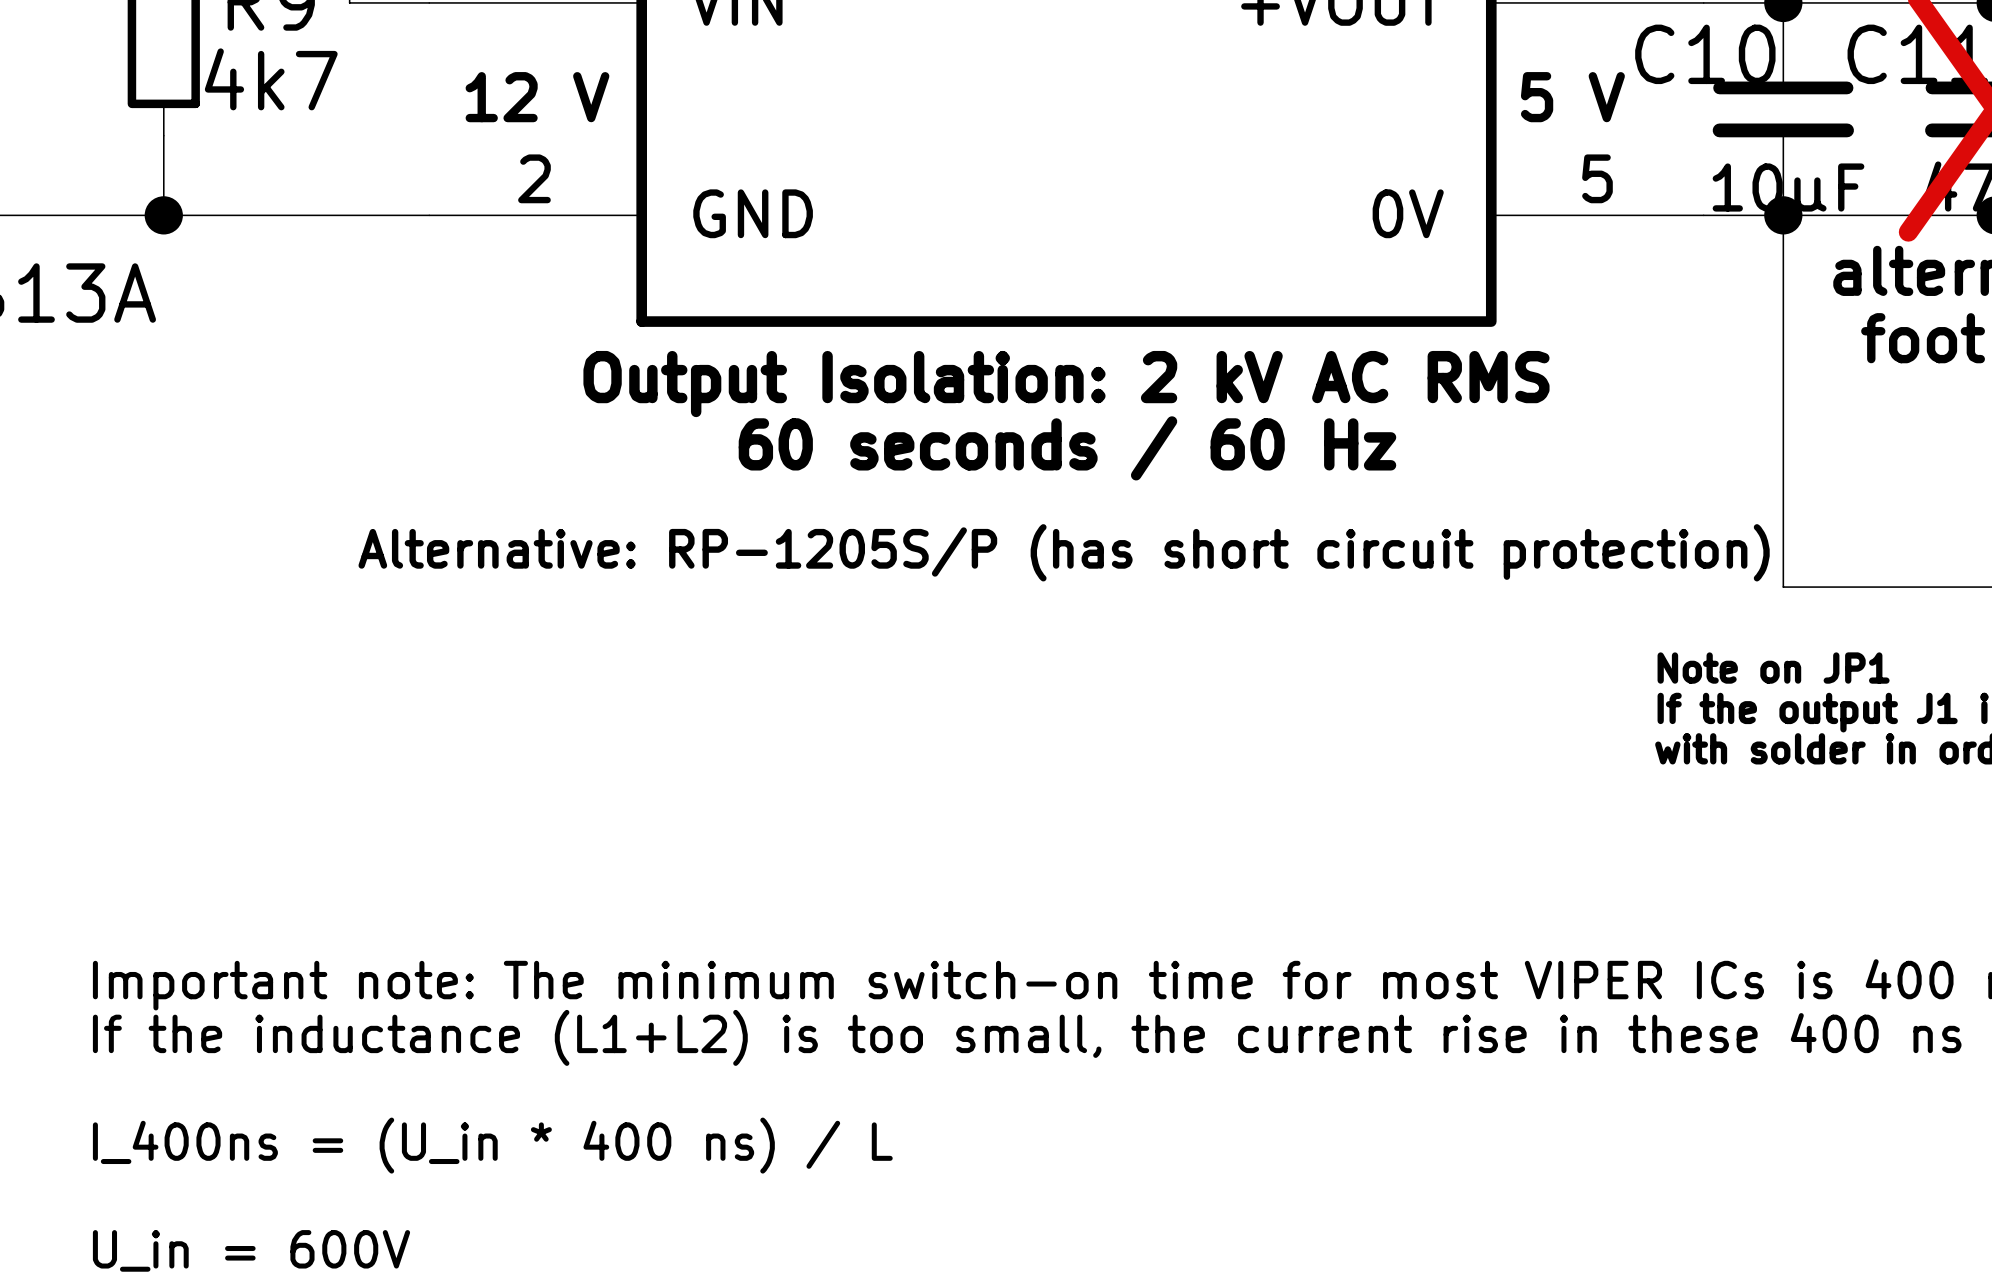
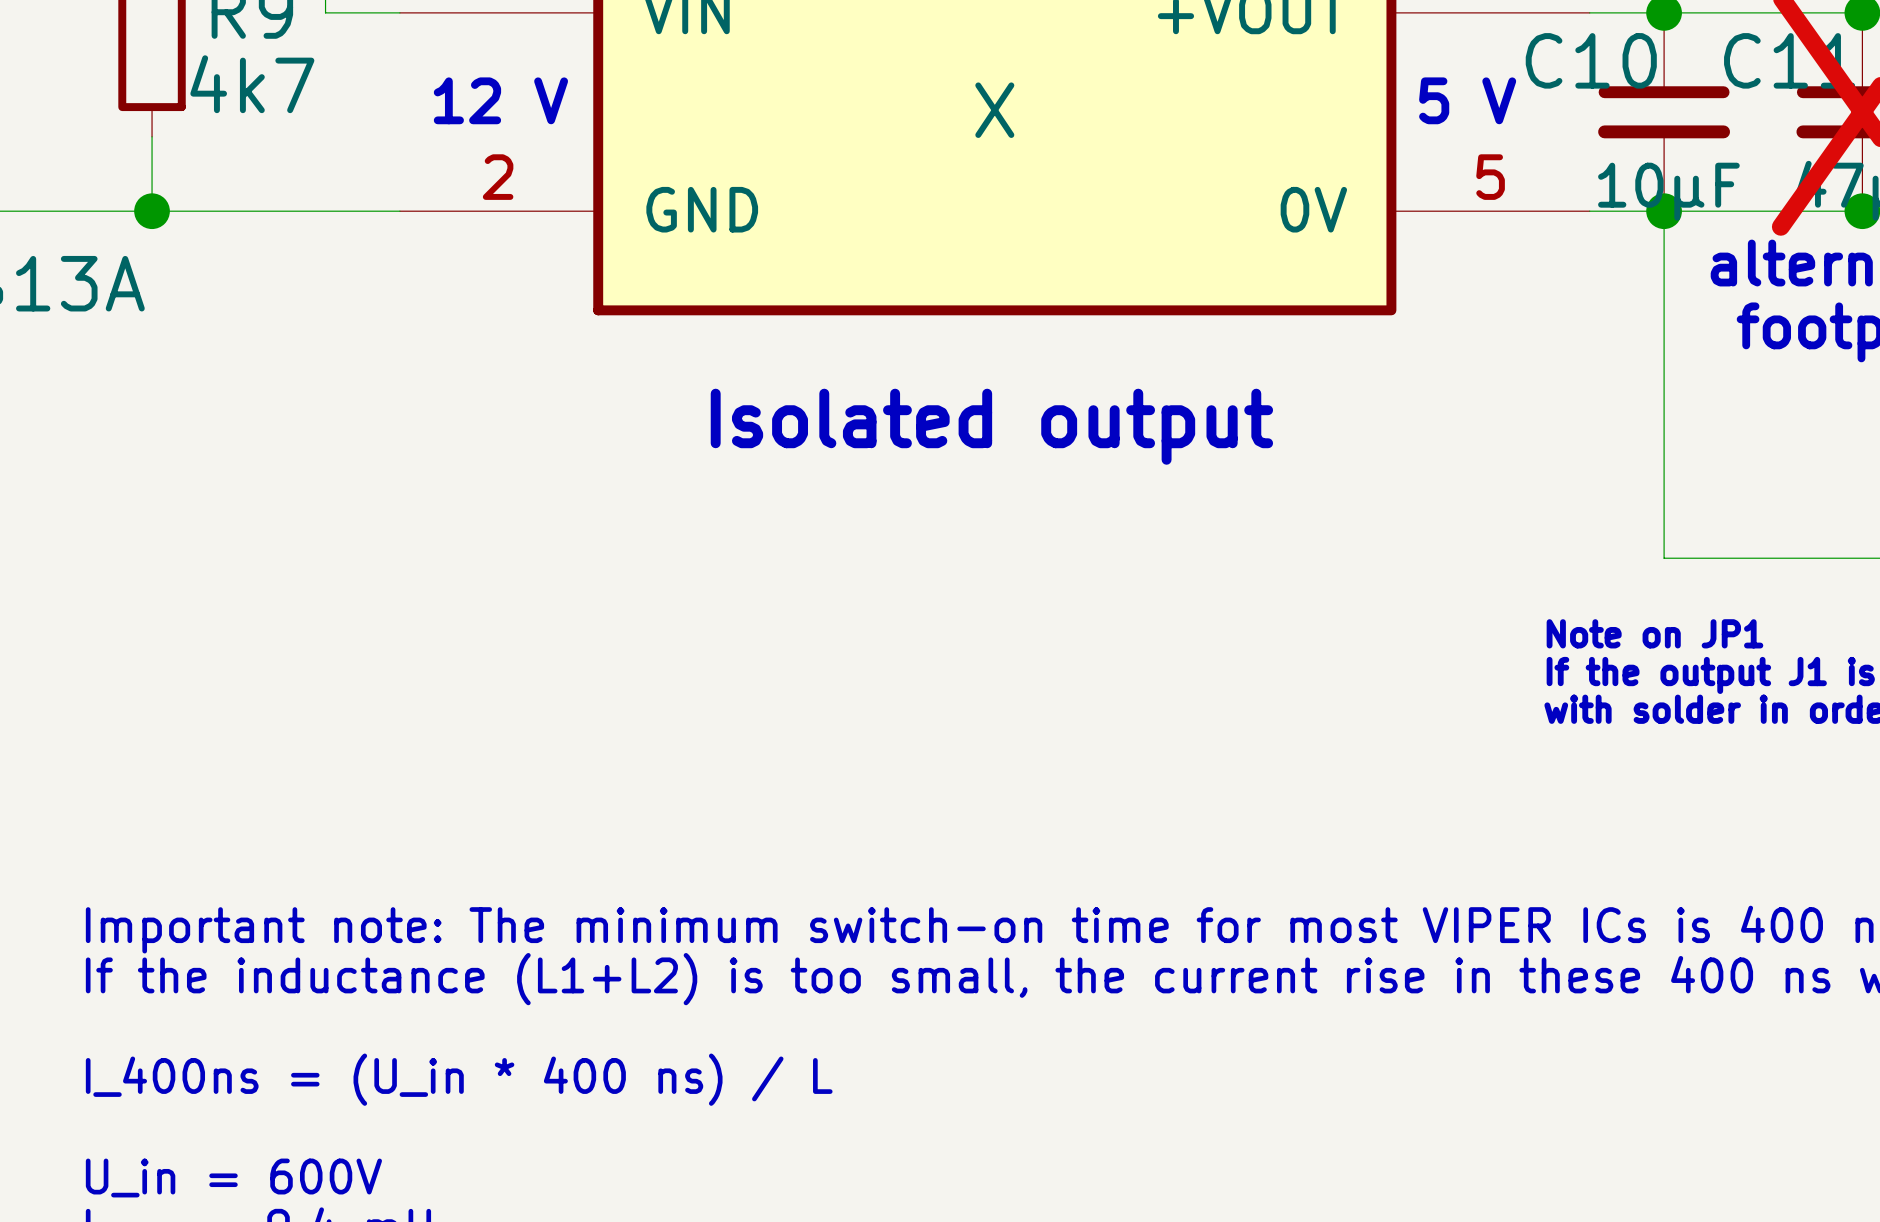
part text: none -> X (994, 110)
text: Output Isolation: 2 kV AC RMS (1066, 384) -> none
text: none -> Isolated output (991, 426)
text: 60 seconds / 60 Hz (1067, 448) -> none
text: Alternative: RP-1205S/P (has short circuit protection) (1064, 552) -> none

